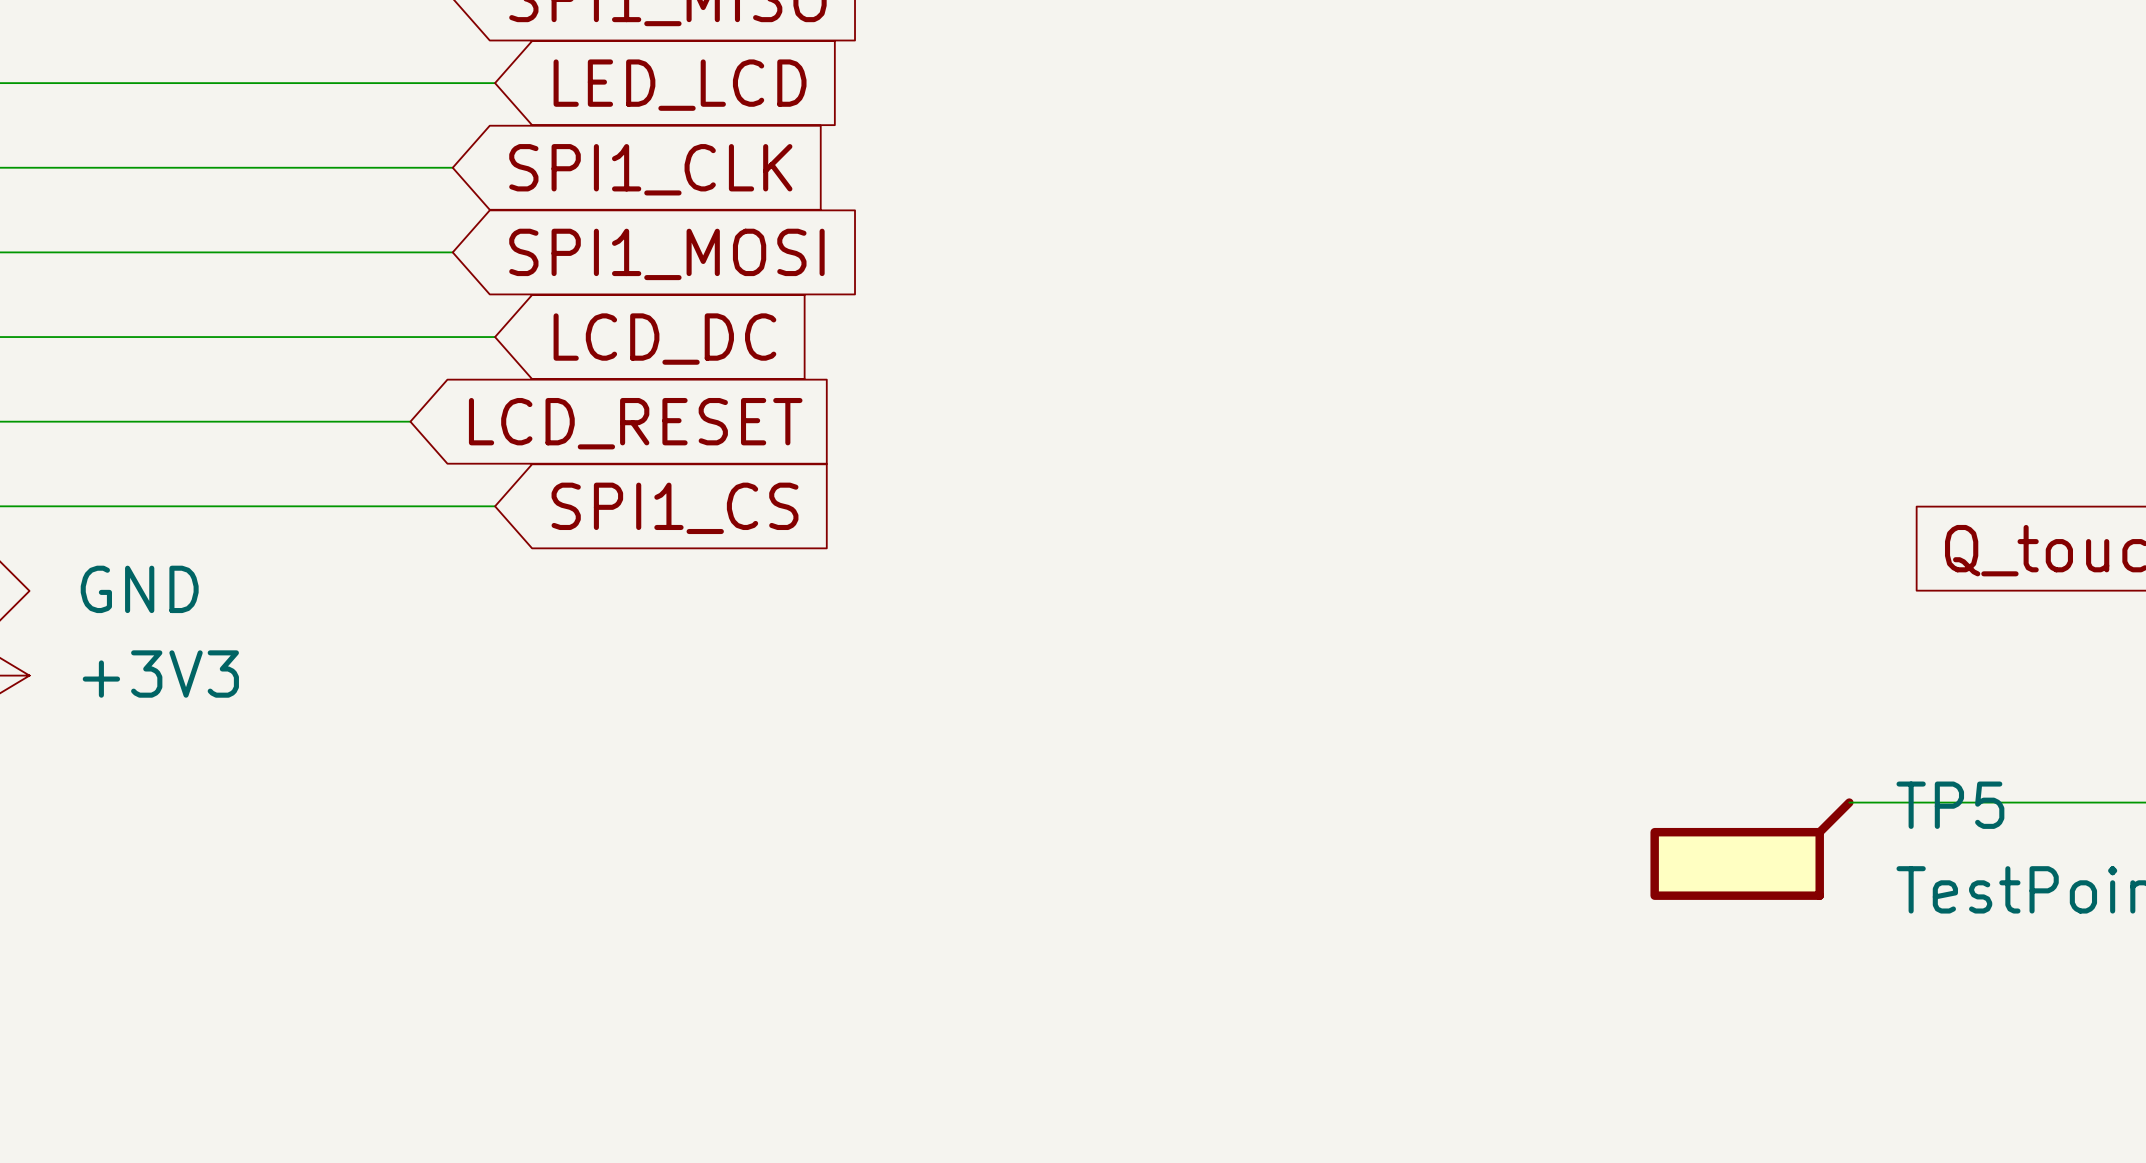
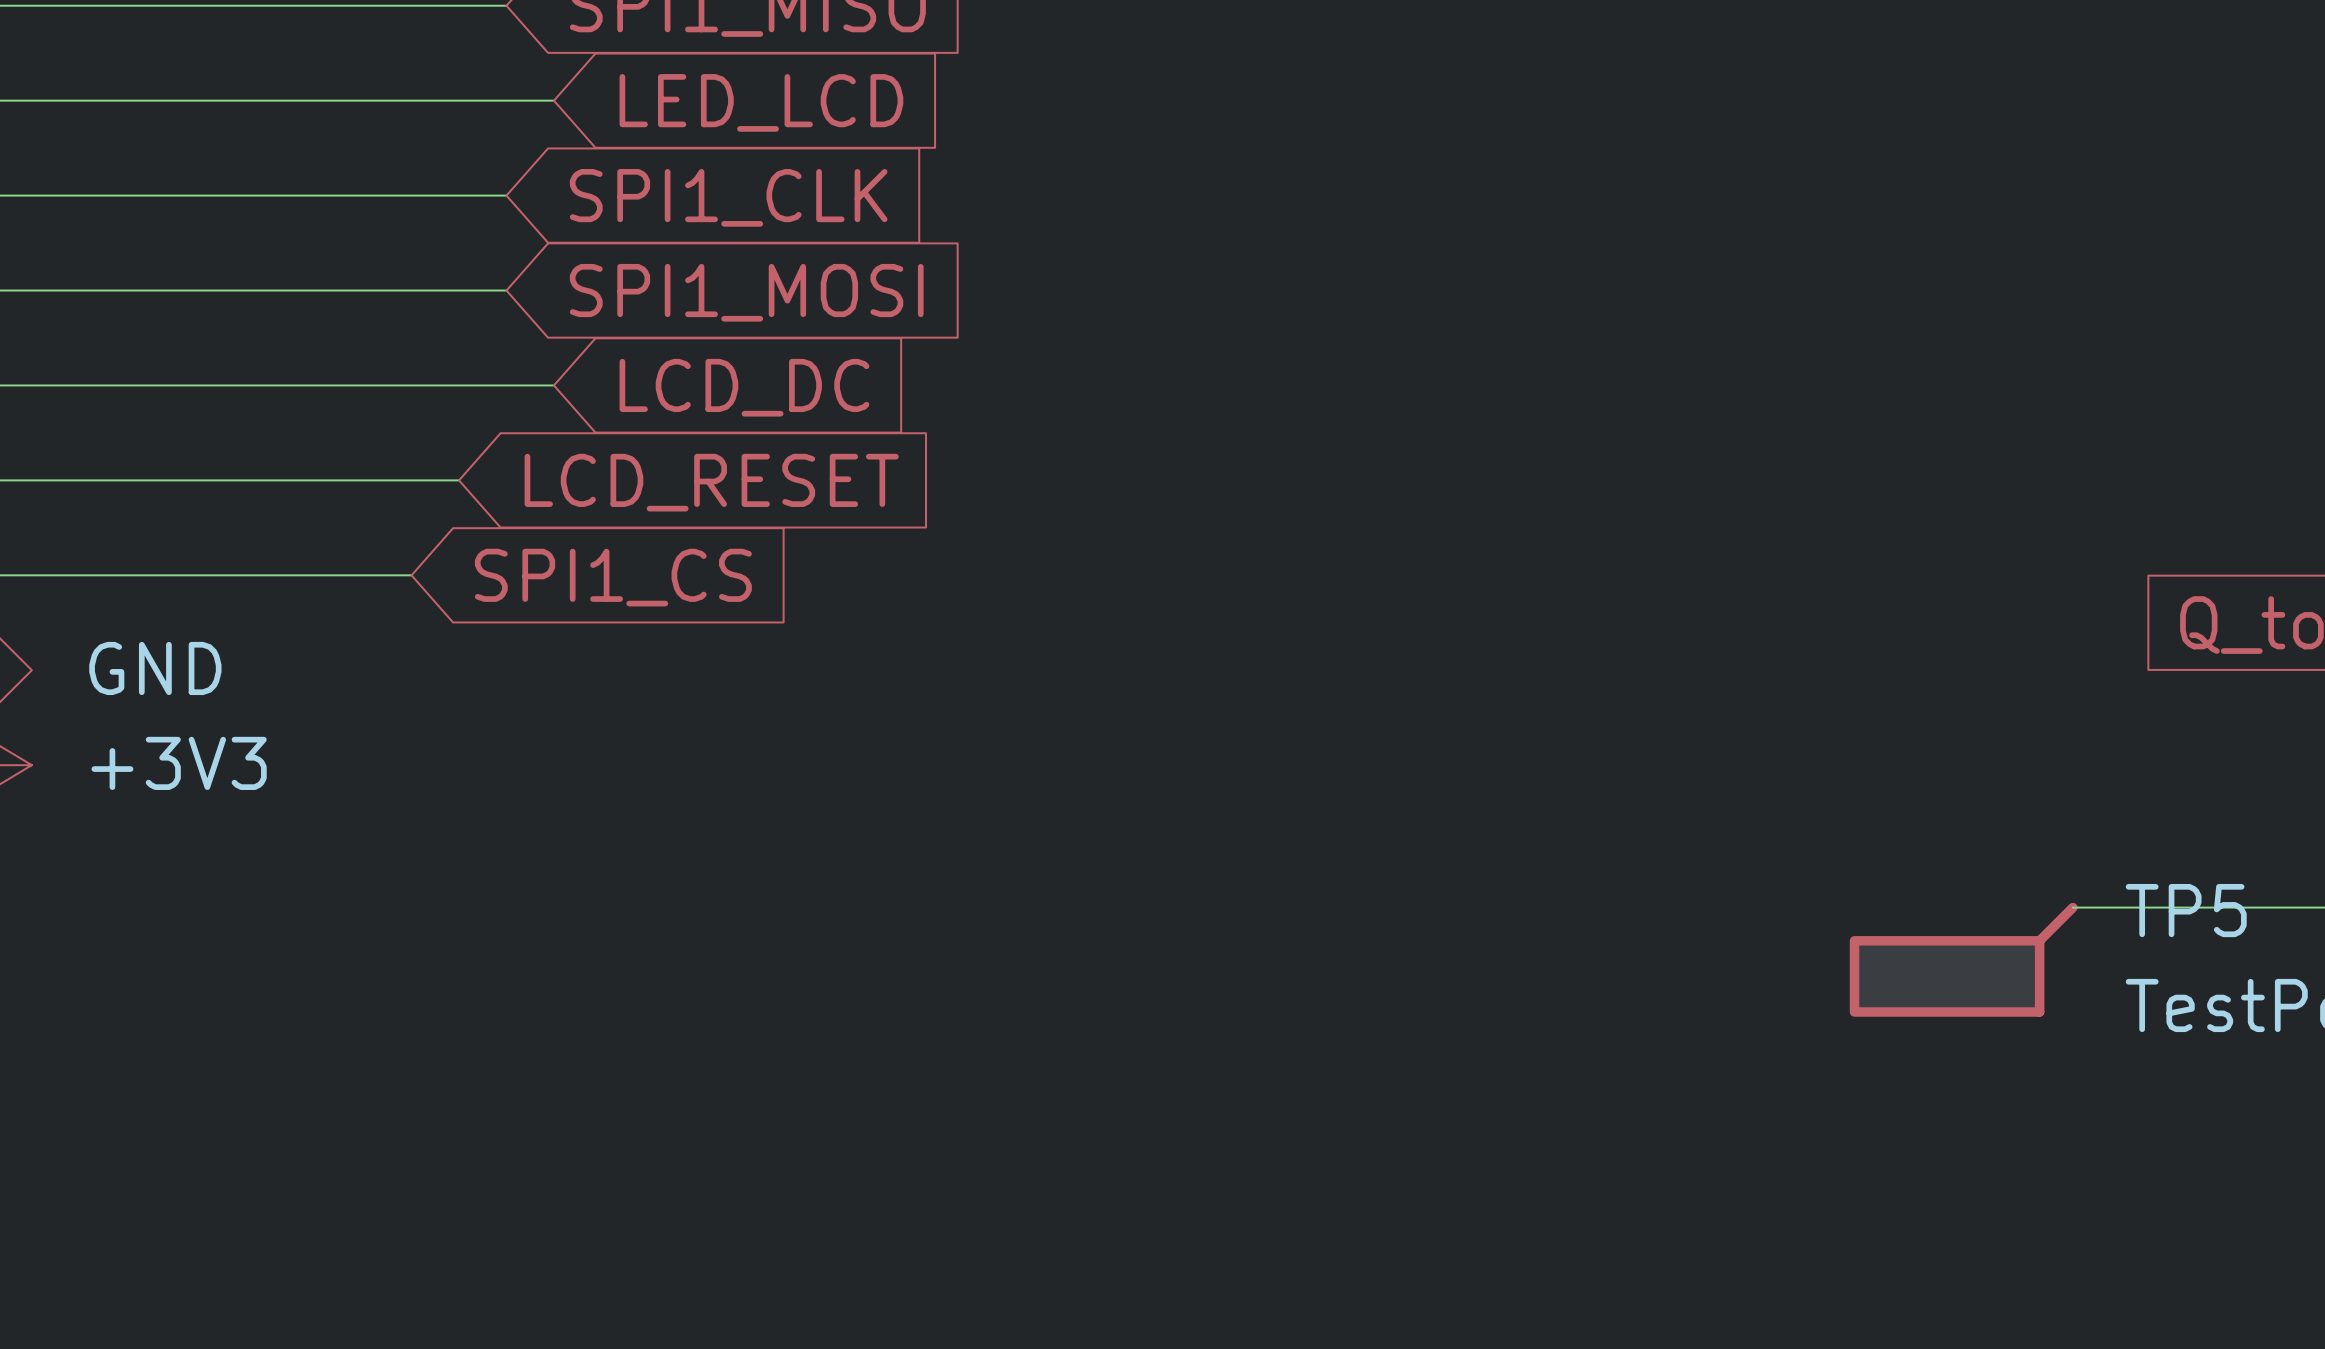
wire: (368, 506) (495, 506) -> none
global label position: SPI1_CS (674, 508) -> SPI1_CS (613, 577)

